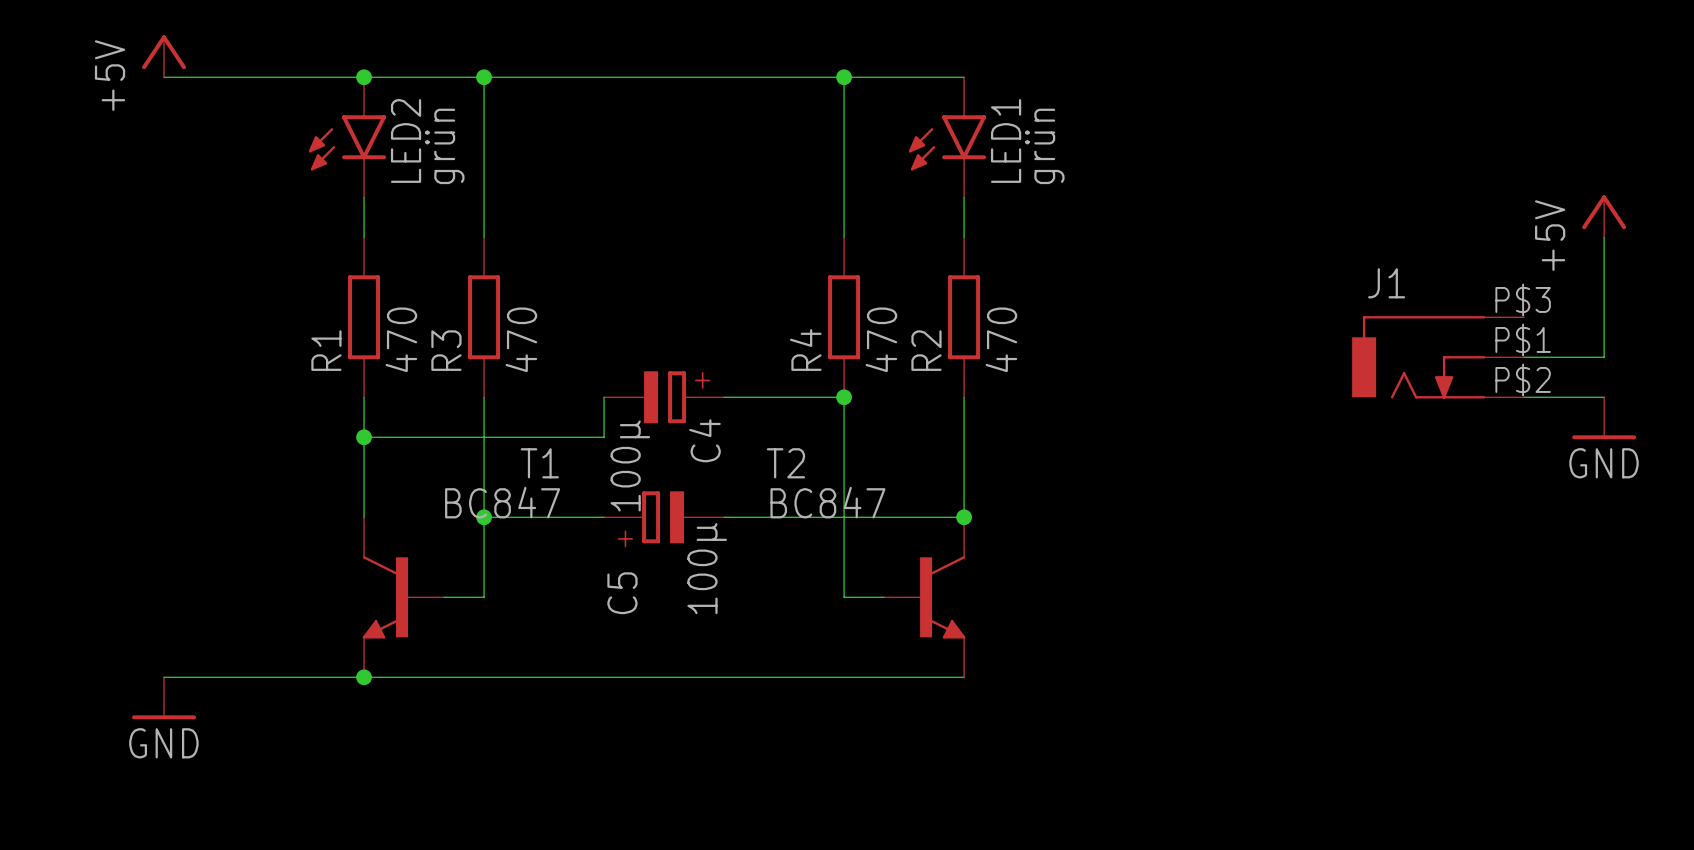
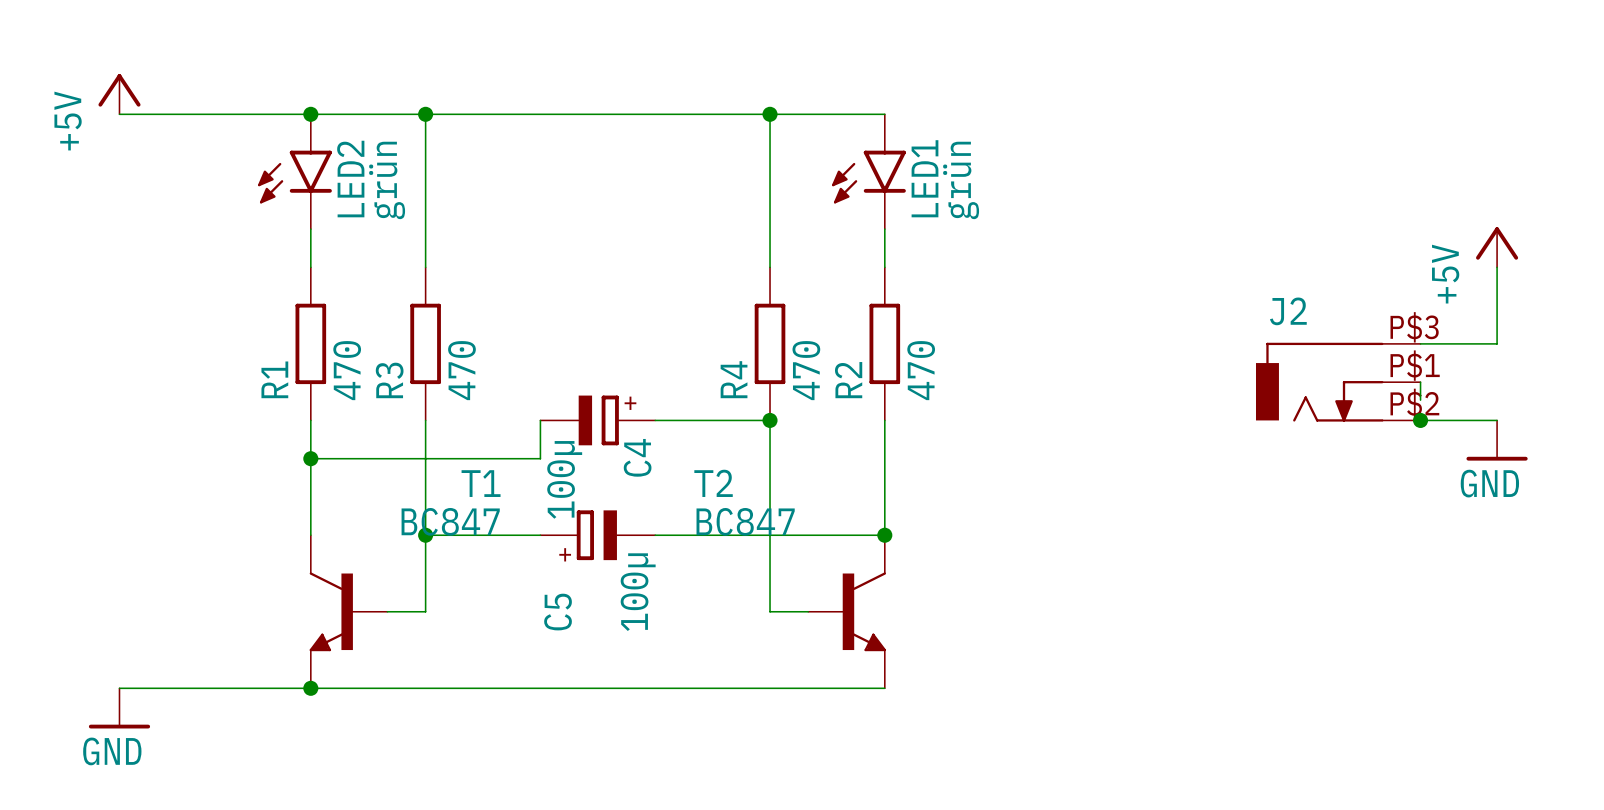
J1 name: J1 (1386, 283) -> J2 (1288, 311)
wire: (1604, 317) (1604, 357) (1524, 357) -> (1497, 343) (1420, 343)
wire: none -> (1420, 382) (1420, 400)
junction: none -> (1420, 420)

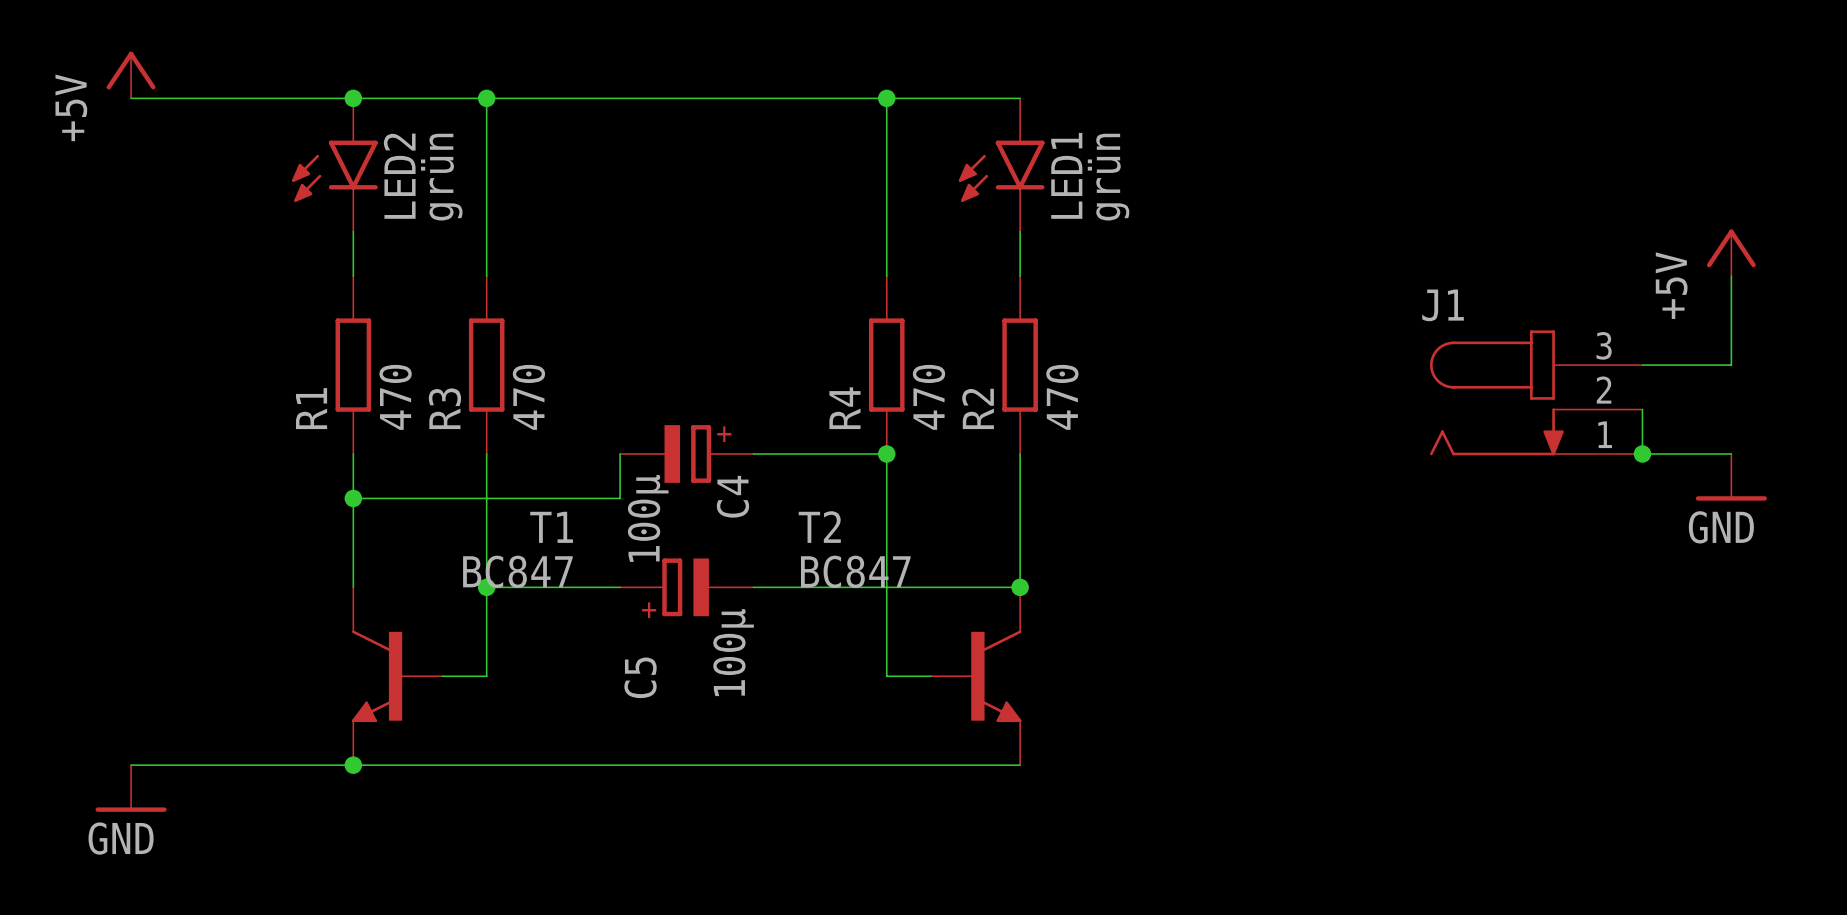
J1: none -> (1536, 392)
J2: (1338, 382) -> none
wire: none -> (1642, 430) (1642, 453)

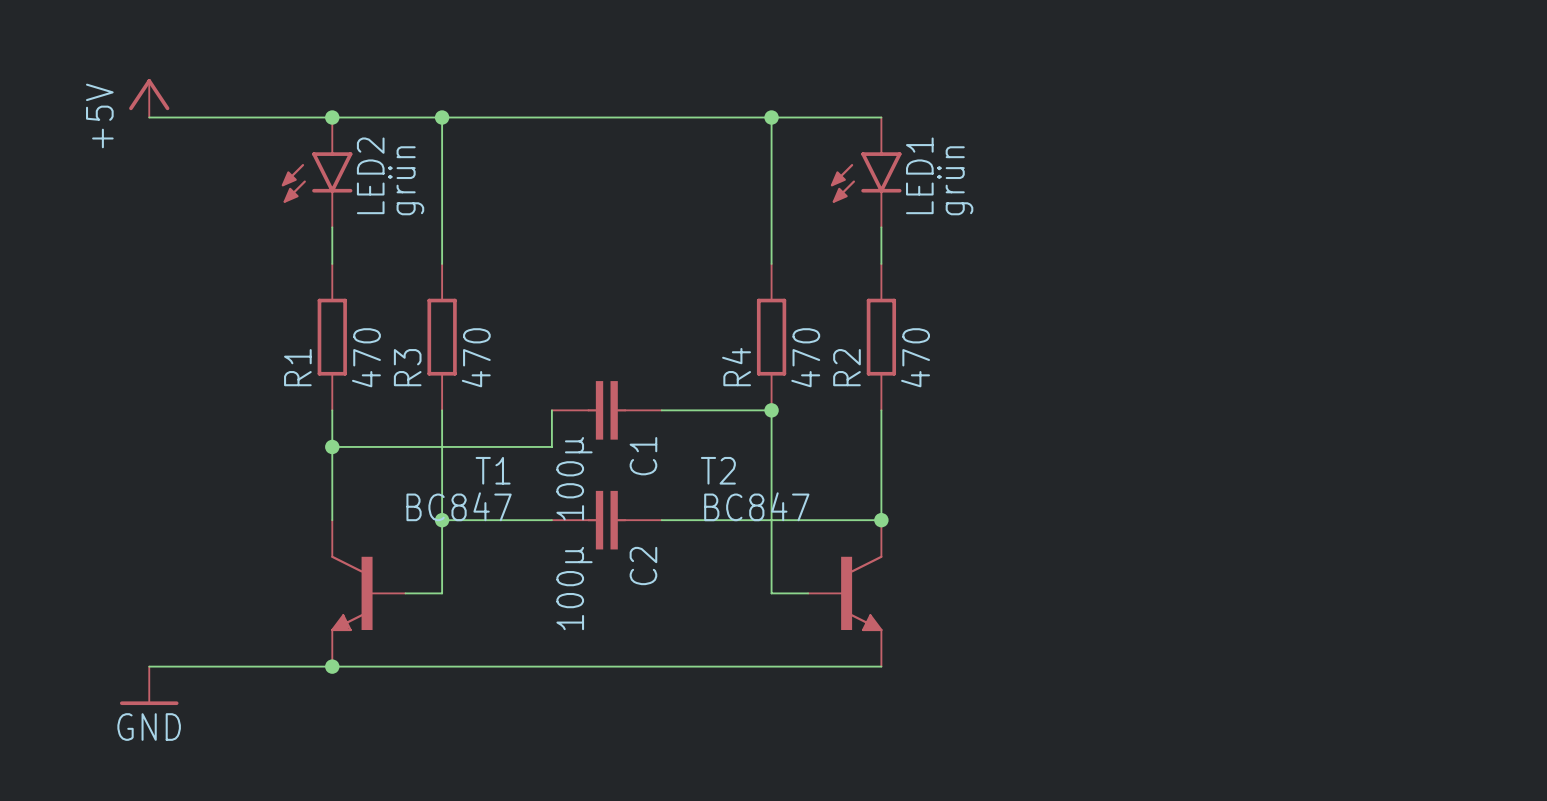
power symbol: +5V (1731, 252) -> none
wire: (1731, 276) (1731, 365) (1642, 365) -> none
J1: (1536, 392) -> none
wire: (1642, 409) (1642, 453) (1731, 453) -> none
C4: 100µ (686, 453) -> none
C1: none -> 100µ (606, 410)
junction: (1642, 453) -> none
power symbol: GND (1731, 477) -> none
C5: 100µ (686, 587) -> none
C2: none -> 100µ (606, 520)

